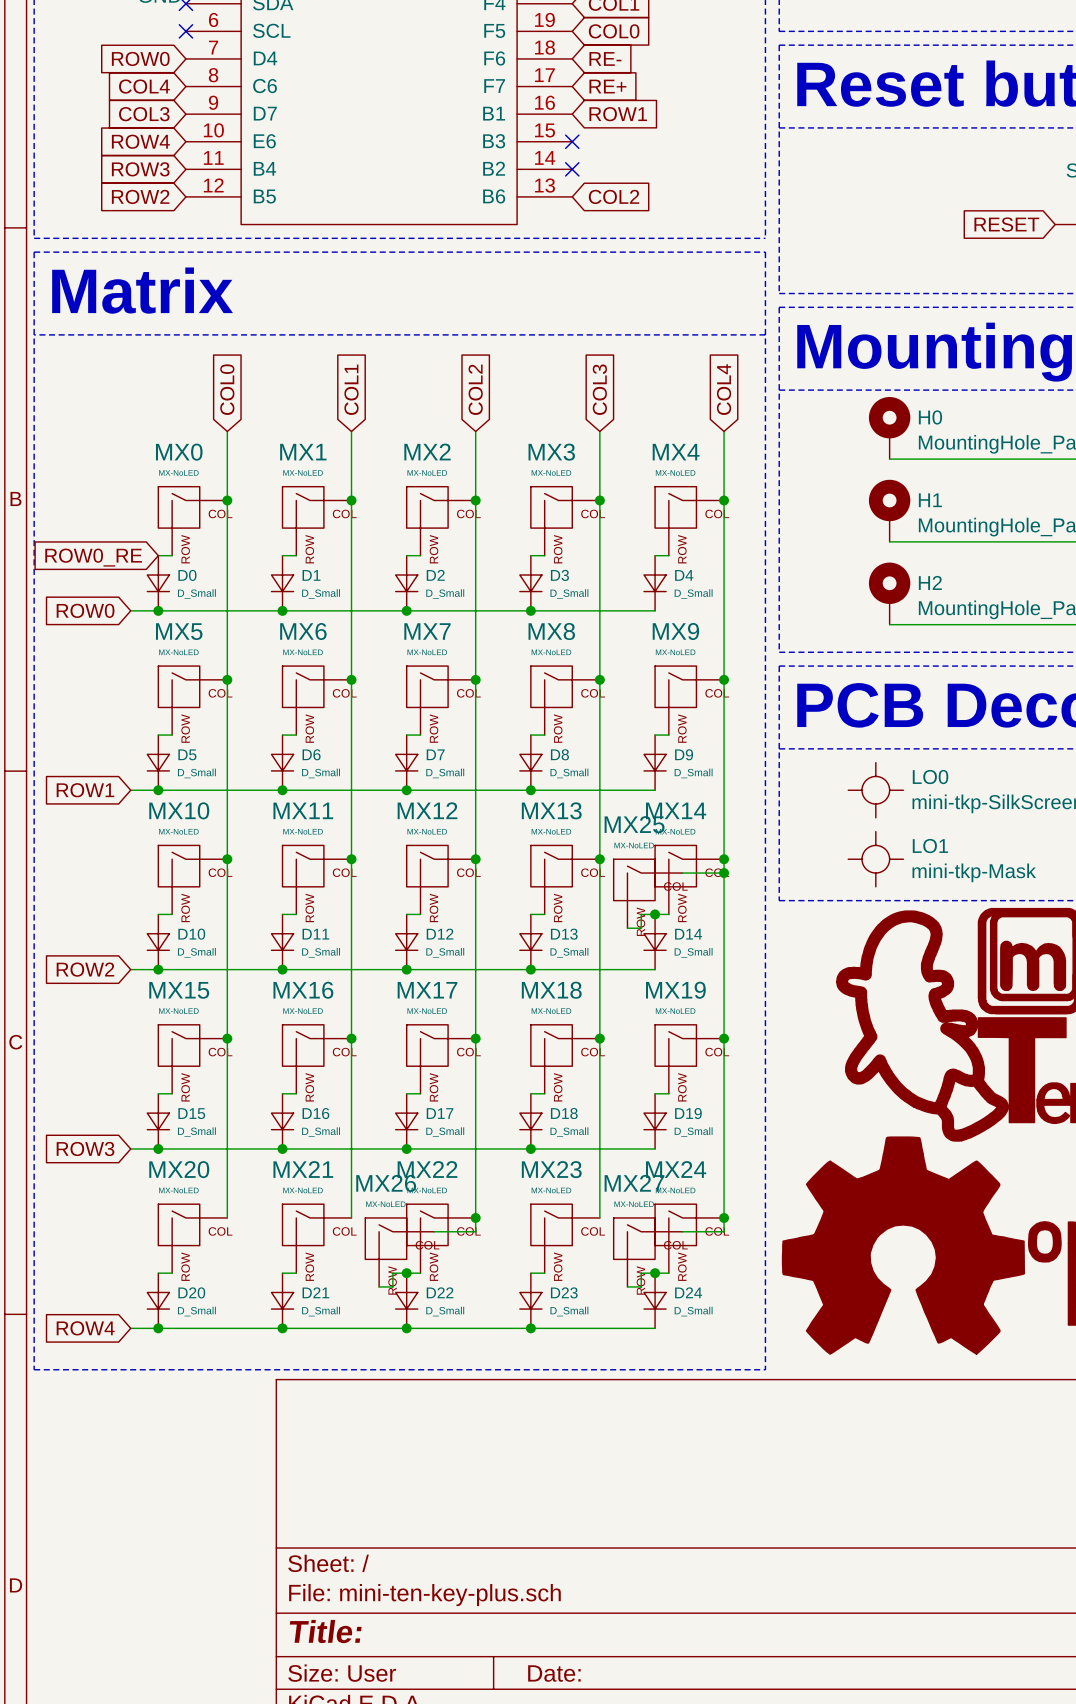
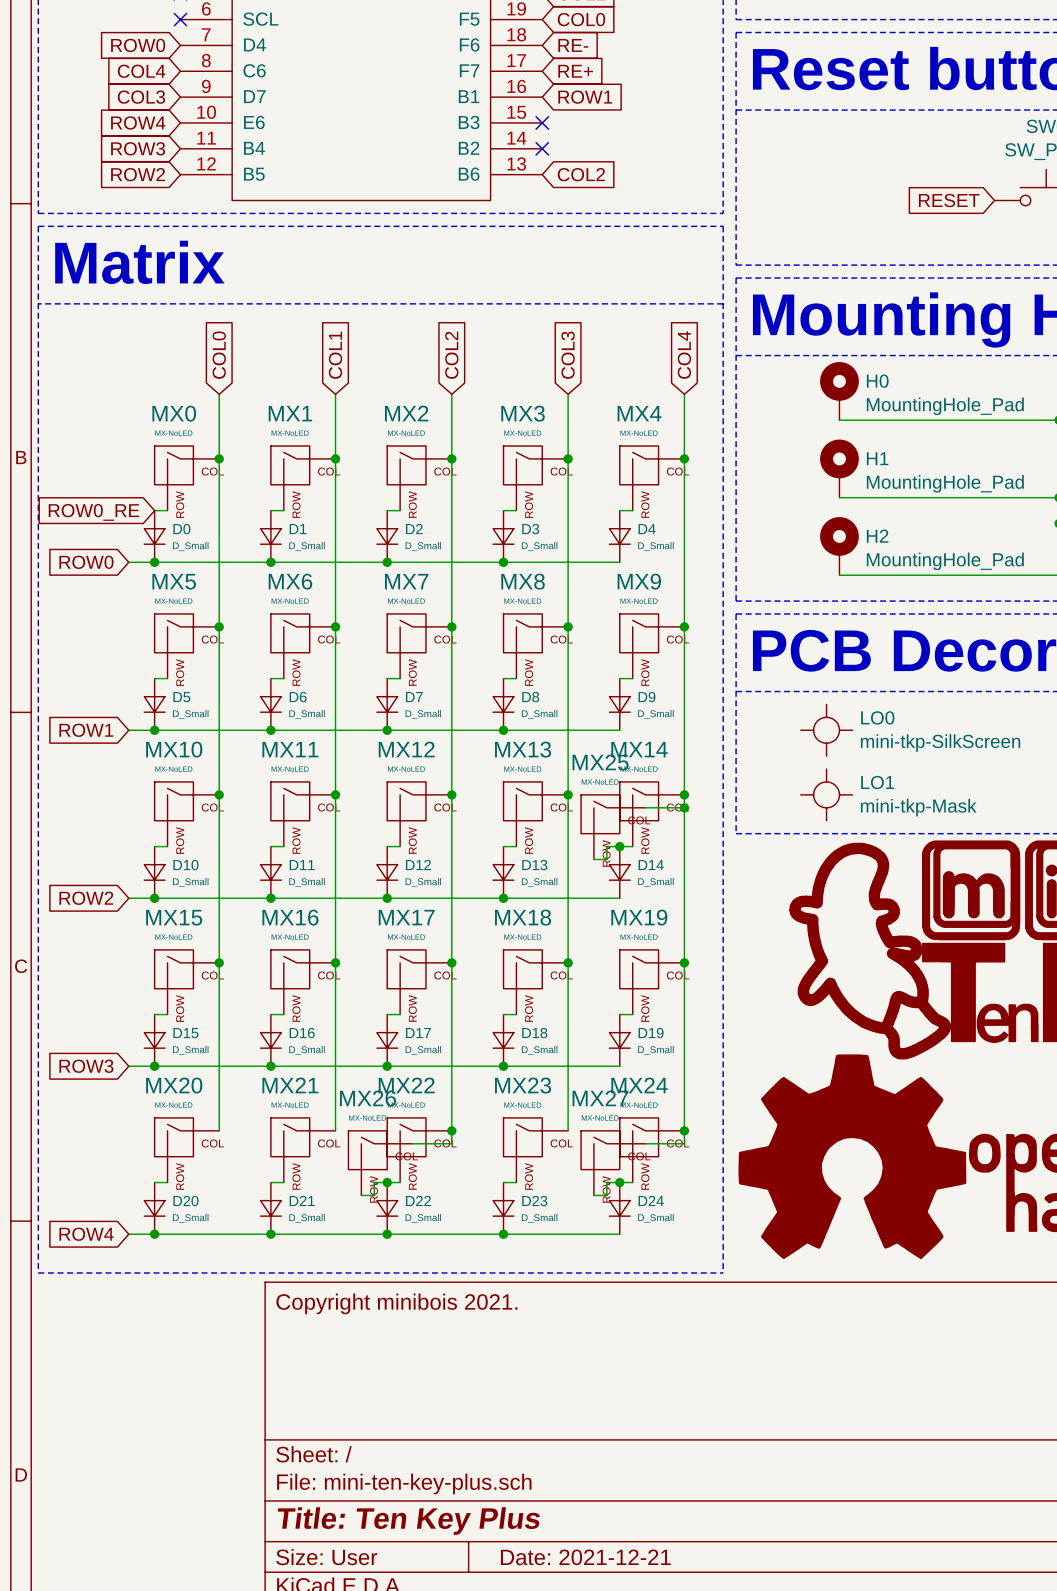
title block: none -> Copyright minibois 2021. (396, 1303)
title block: Title: (325, 1631) -> Title: Ten Key Plus (408, 1521)
title block: Date: (554, 1673) -> Date: 2021-12-21 (585, 1557)

